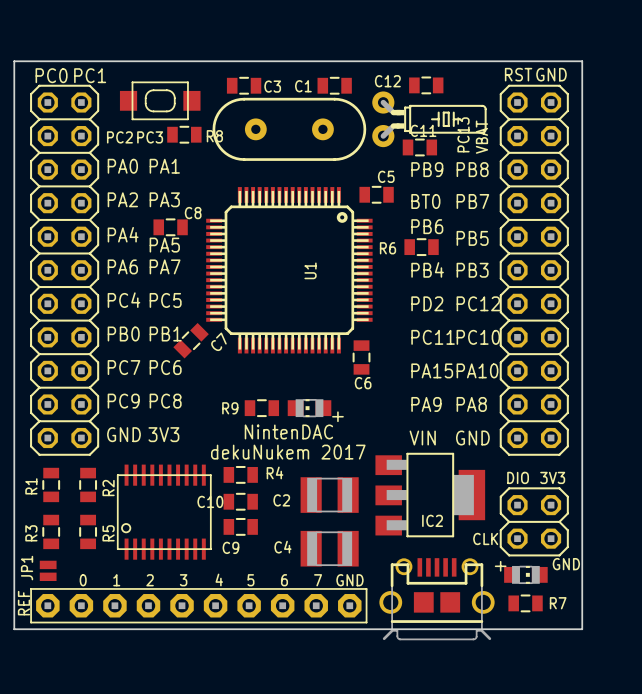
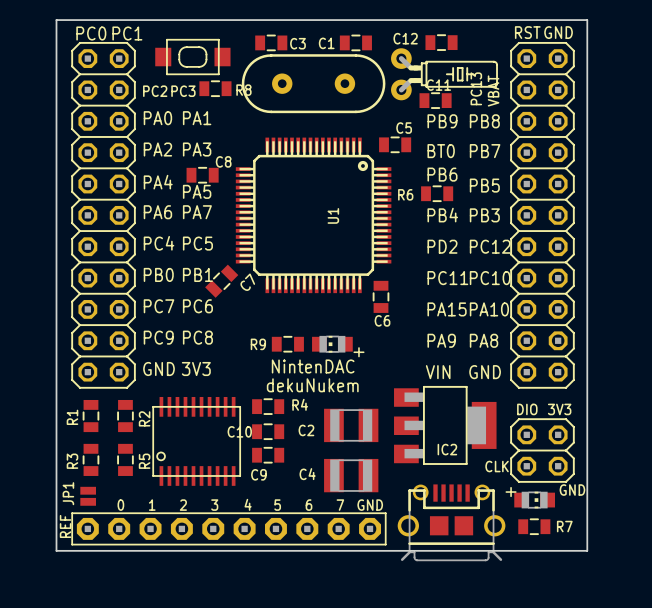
text: dekuNukem 2017 (288, 452) -> dekuNukem (312, 385)

